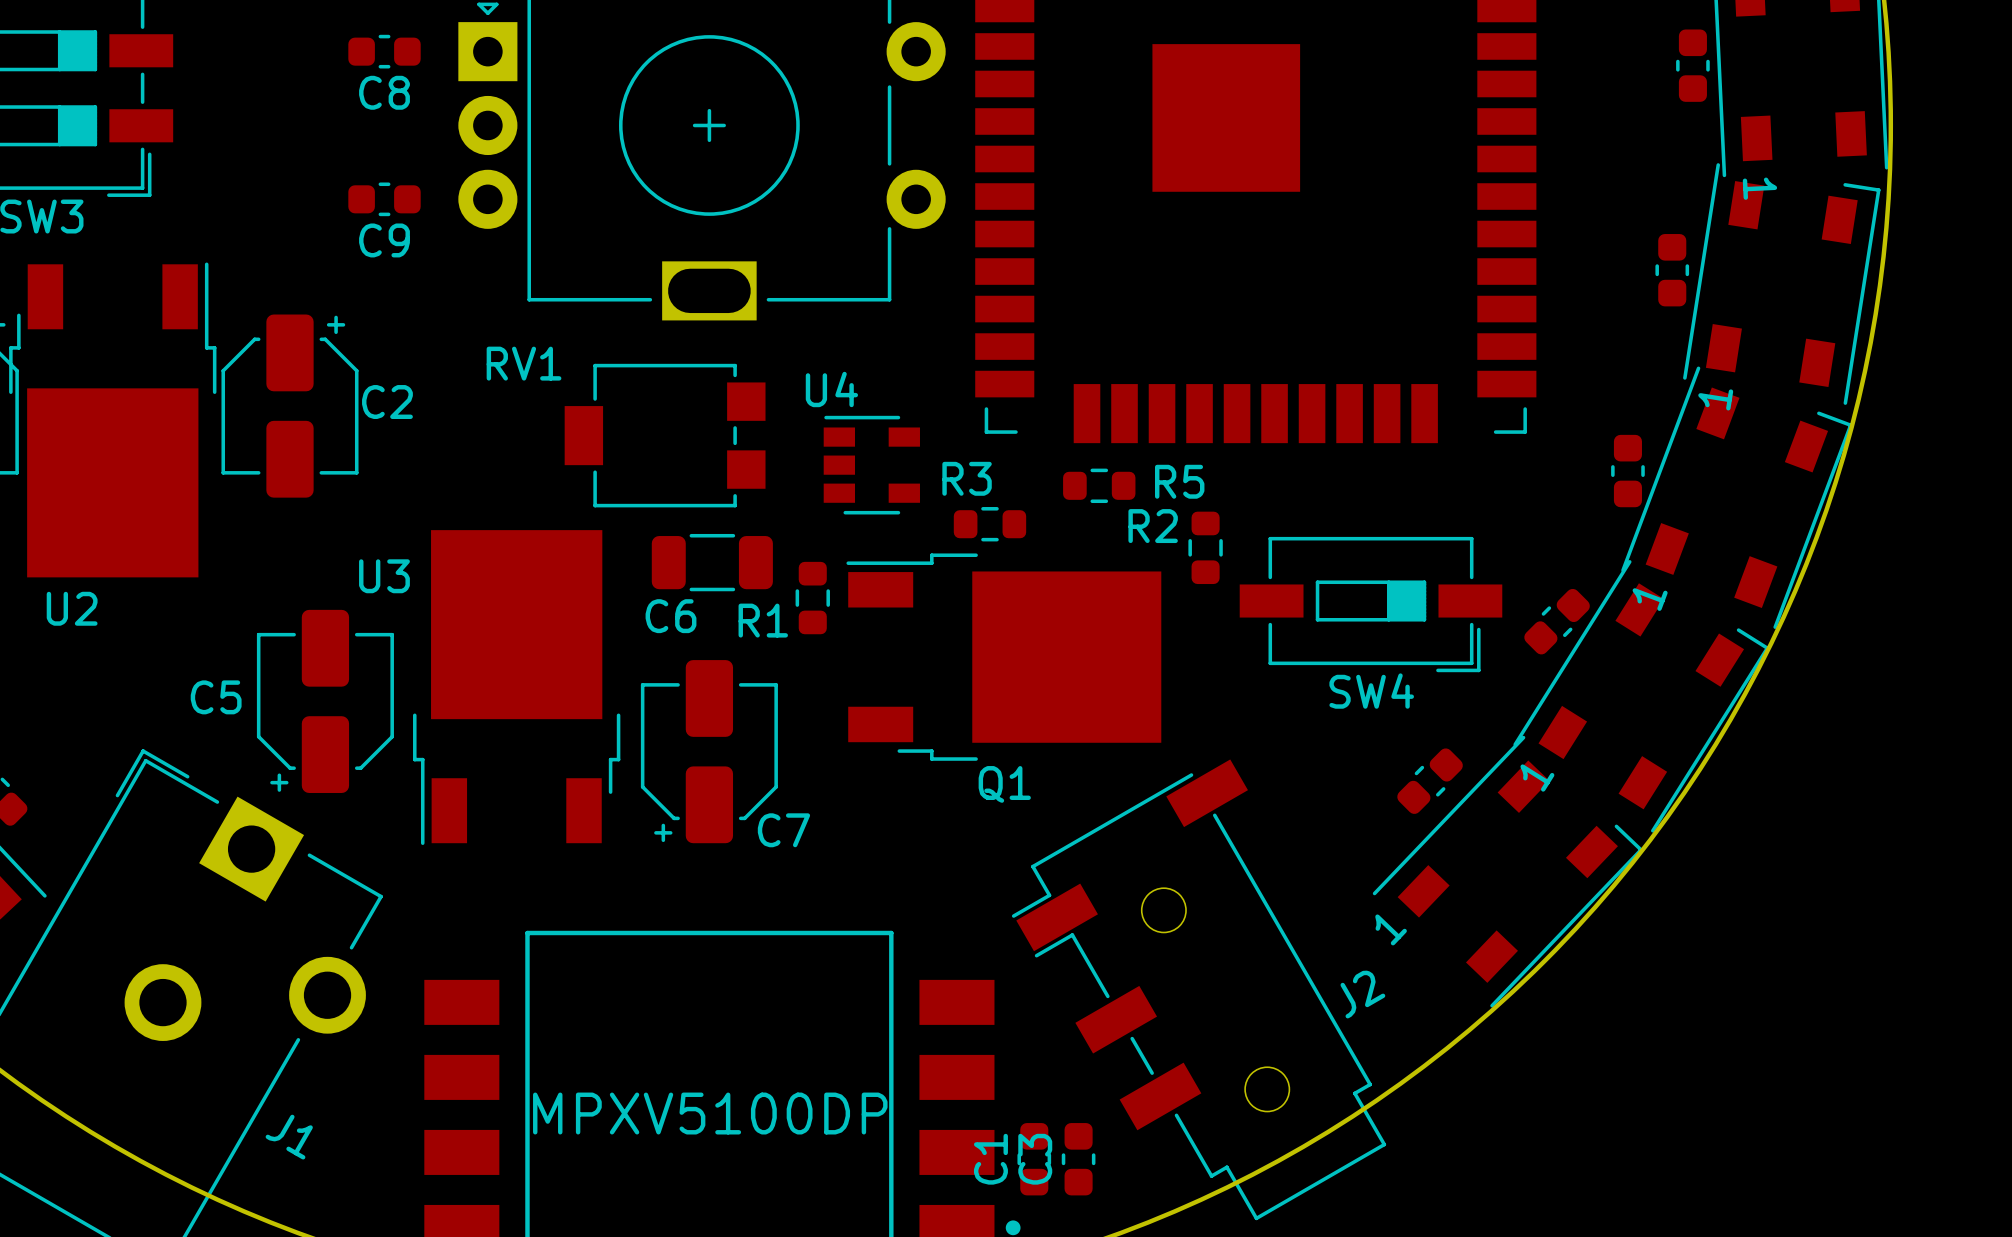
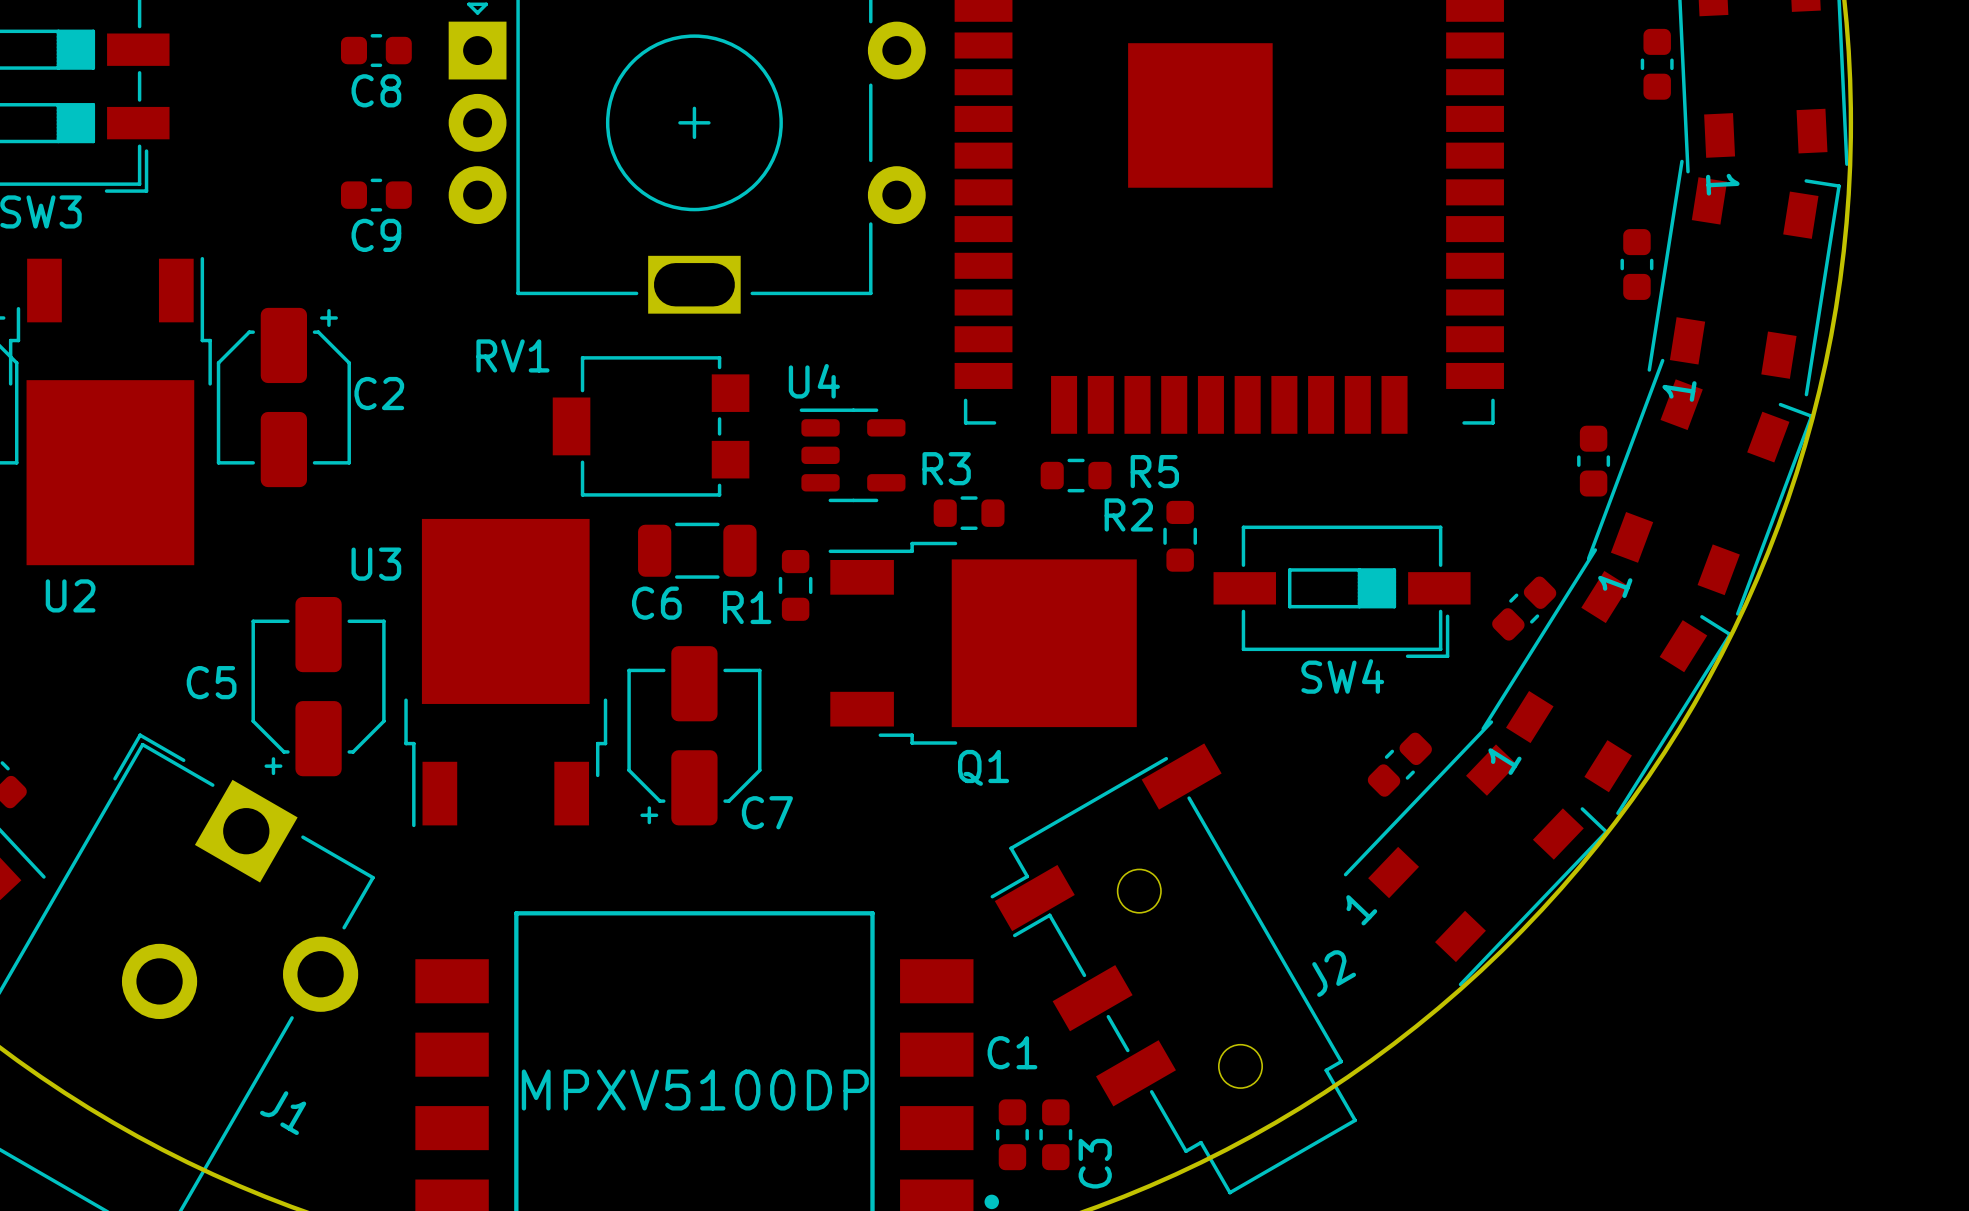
U4 footprint: [823, 415, 920, 515] -> [799, 408, 906, 503]
C1 name rotation: 0° (990, 1159) -> 90° clockwise (1012, 1052)
C1 name position: C1 (990, 1159) -> C1 (1012, 1052)
C3 name position: C3 (1035, 1159) -> C3 (1095, 1163)

